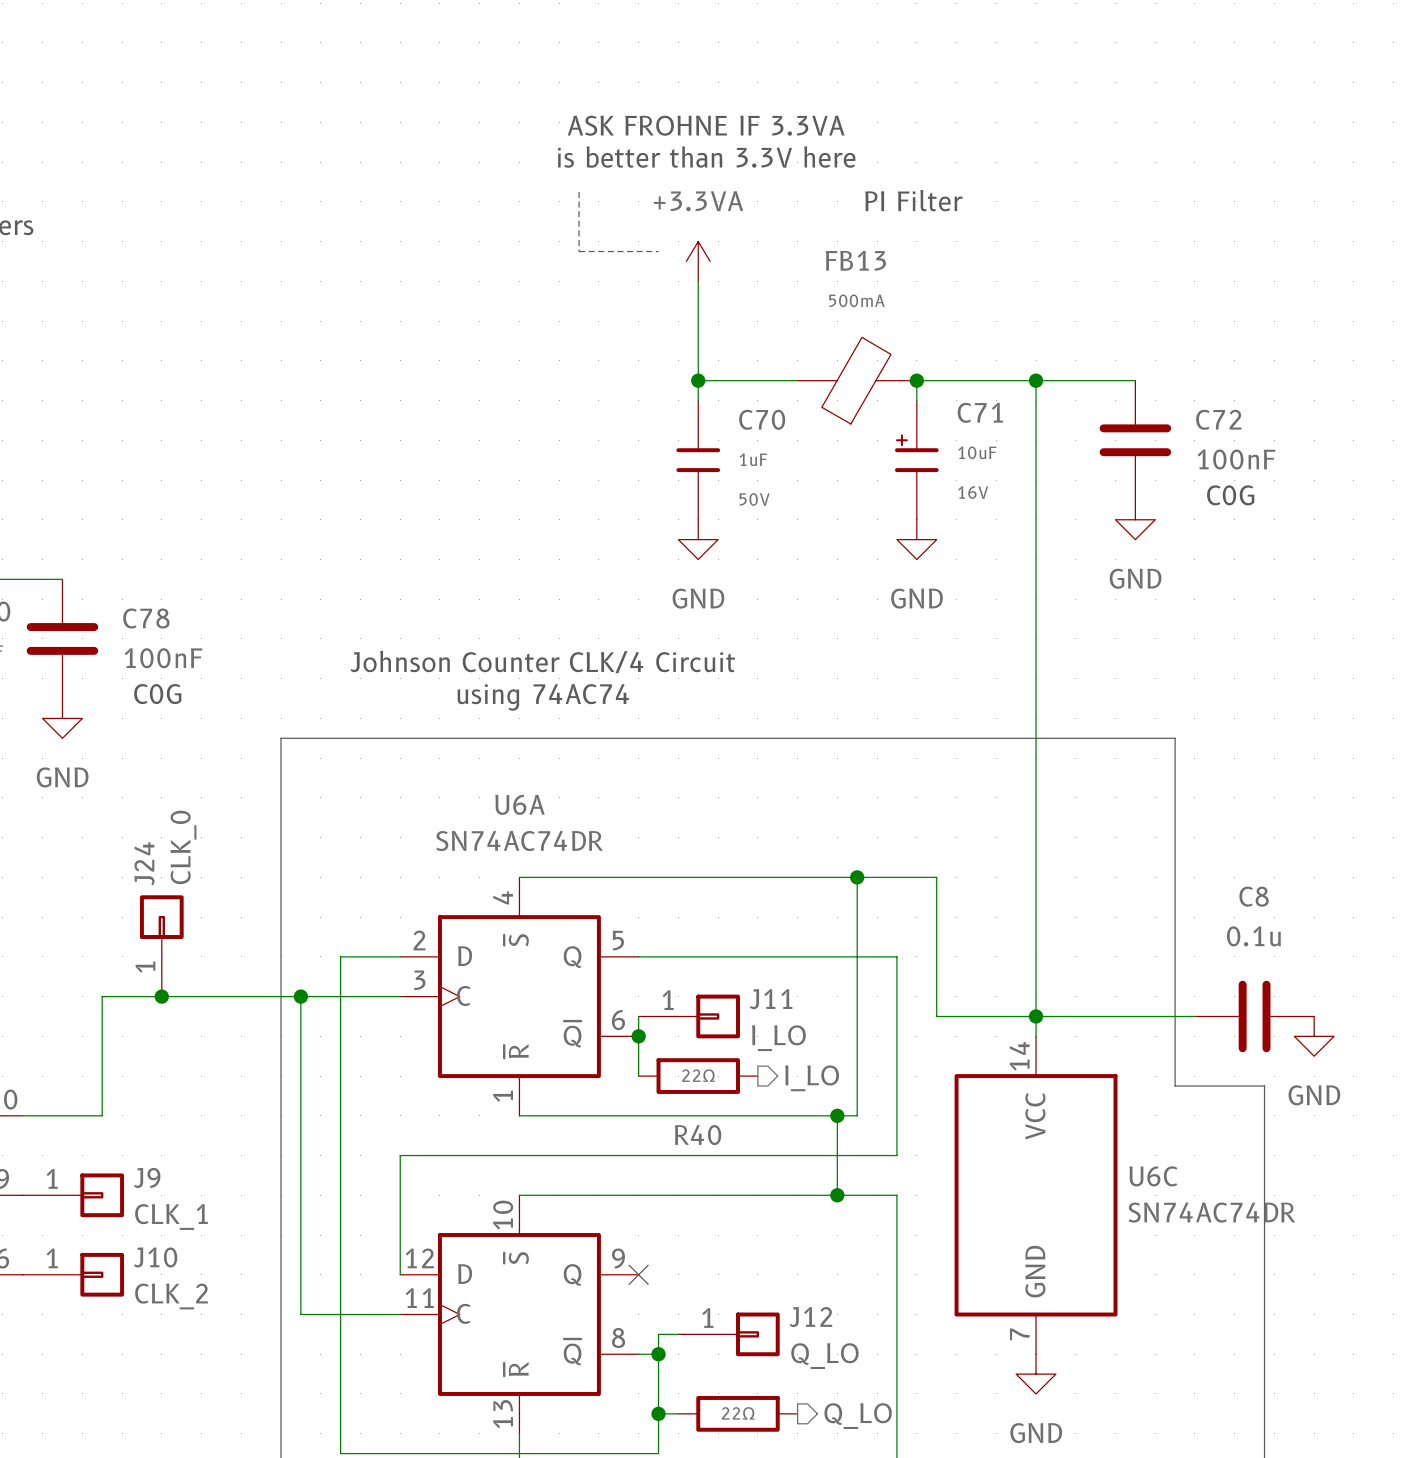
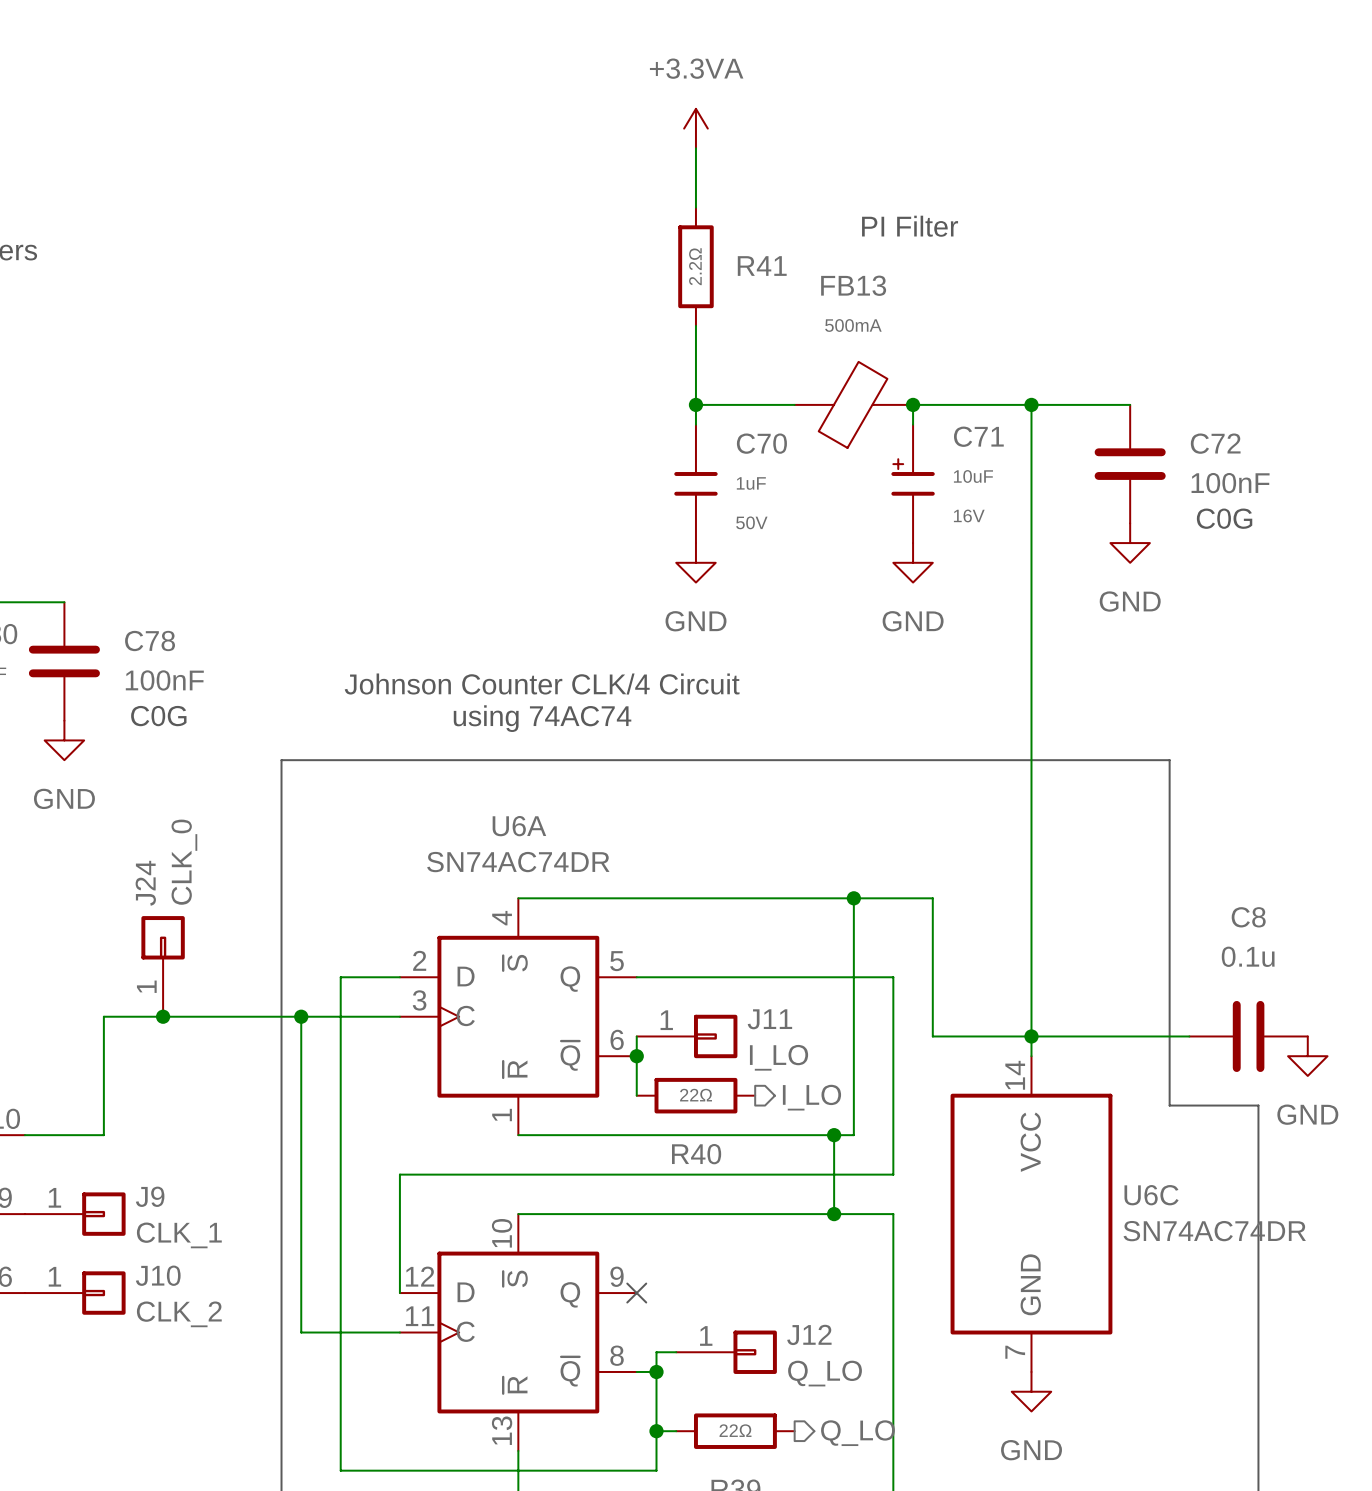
wire: none -> (695, 148) (695, 207)
text: ASK FROHNE IF 3.3VA (706, 125) -> none
text: is better than 3.3V here (706, 157) -> none
line: (579, 191) (579, 251) (658, 251) -> none
R41: none -> 2.2Ω (695, 266)
power symbol position: +3.3VA (698, 261) -> +3.3VA (695, 128)

